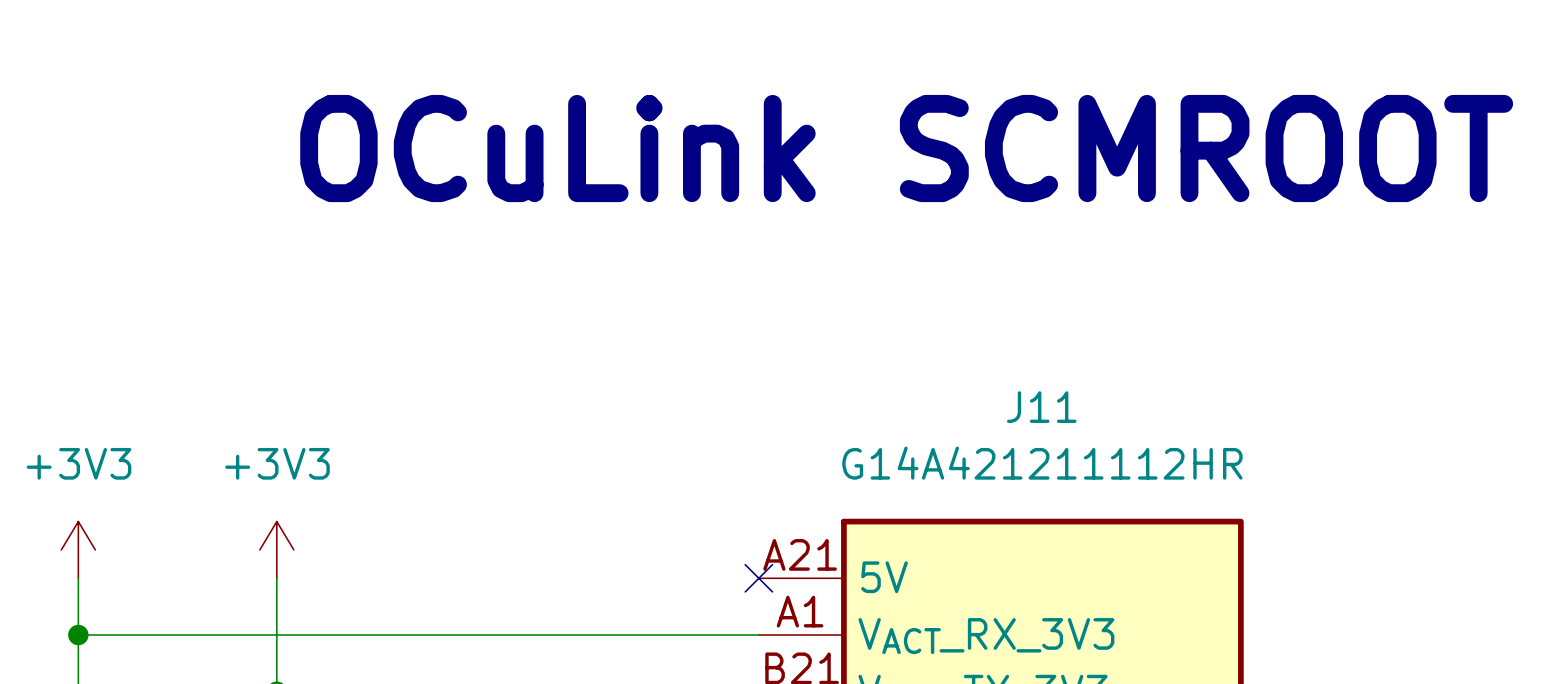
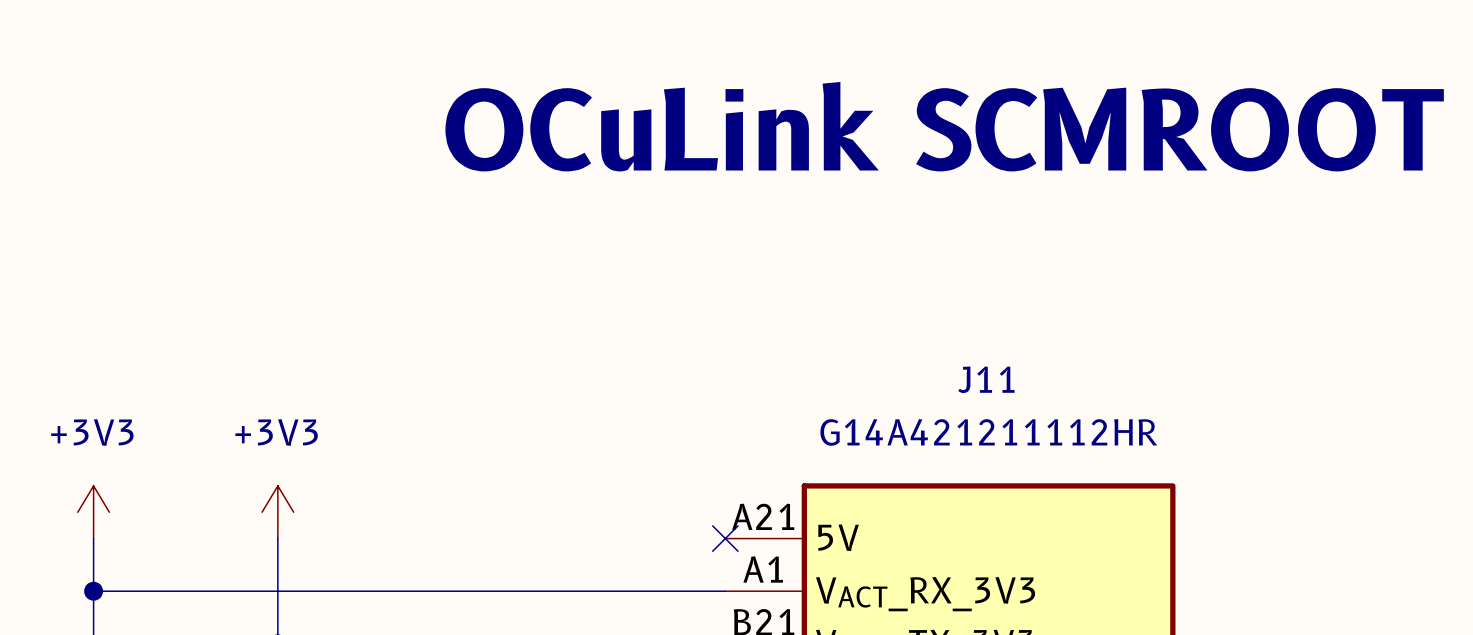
text position: OCuLink SCMROOT (906, 148) -> OCuLink SCMROOT (944, 126)

